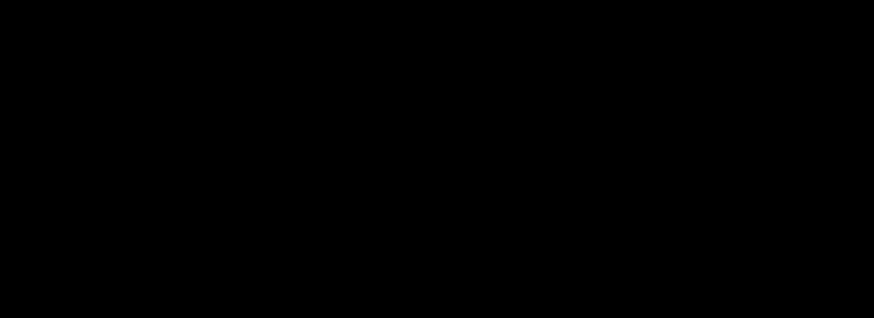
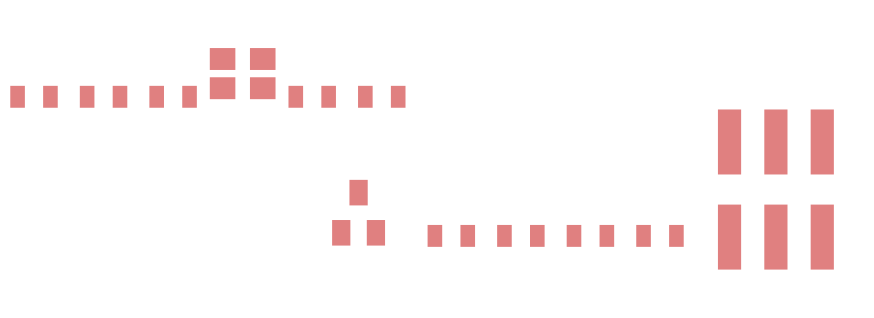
part: none -> (242, 73)
part: none -> (34, 96)
part: none -> (103, 96)
part: none -> (173, 96)
part: none -> (312, 96)
part: none -> (381, 96)
part: none -> (775, 189)
part: none -> (358, 212)
part: none -> (451, 235)
part: none -> (520, 235)
part: none -> (590, 235)
part: none -> (659, 235)

